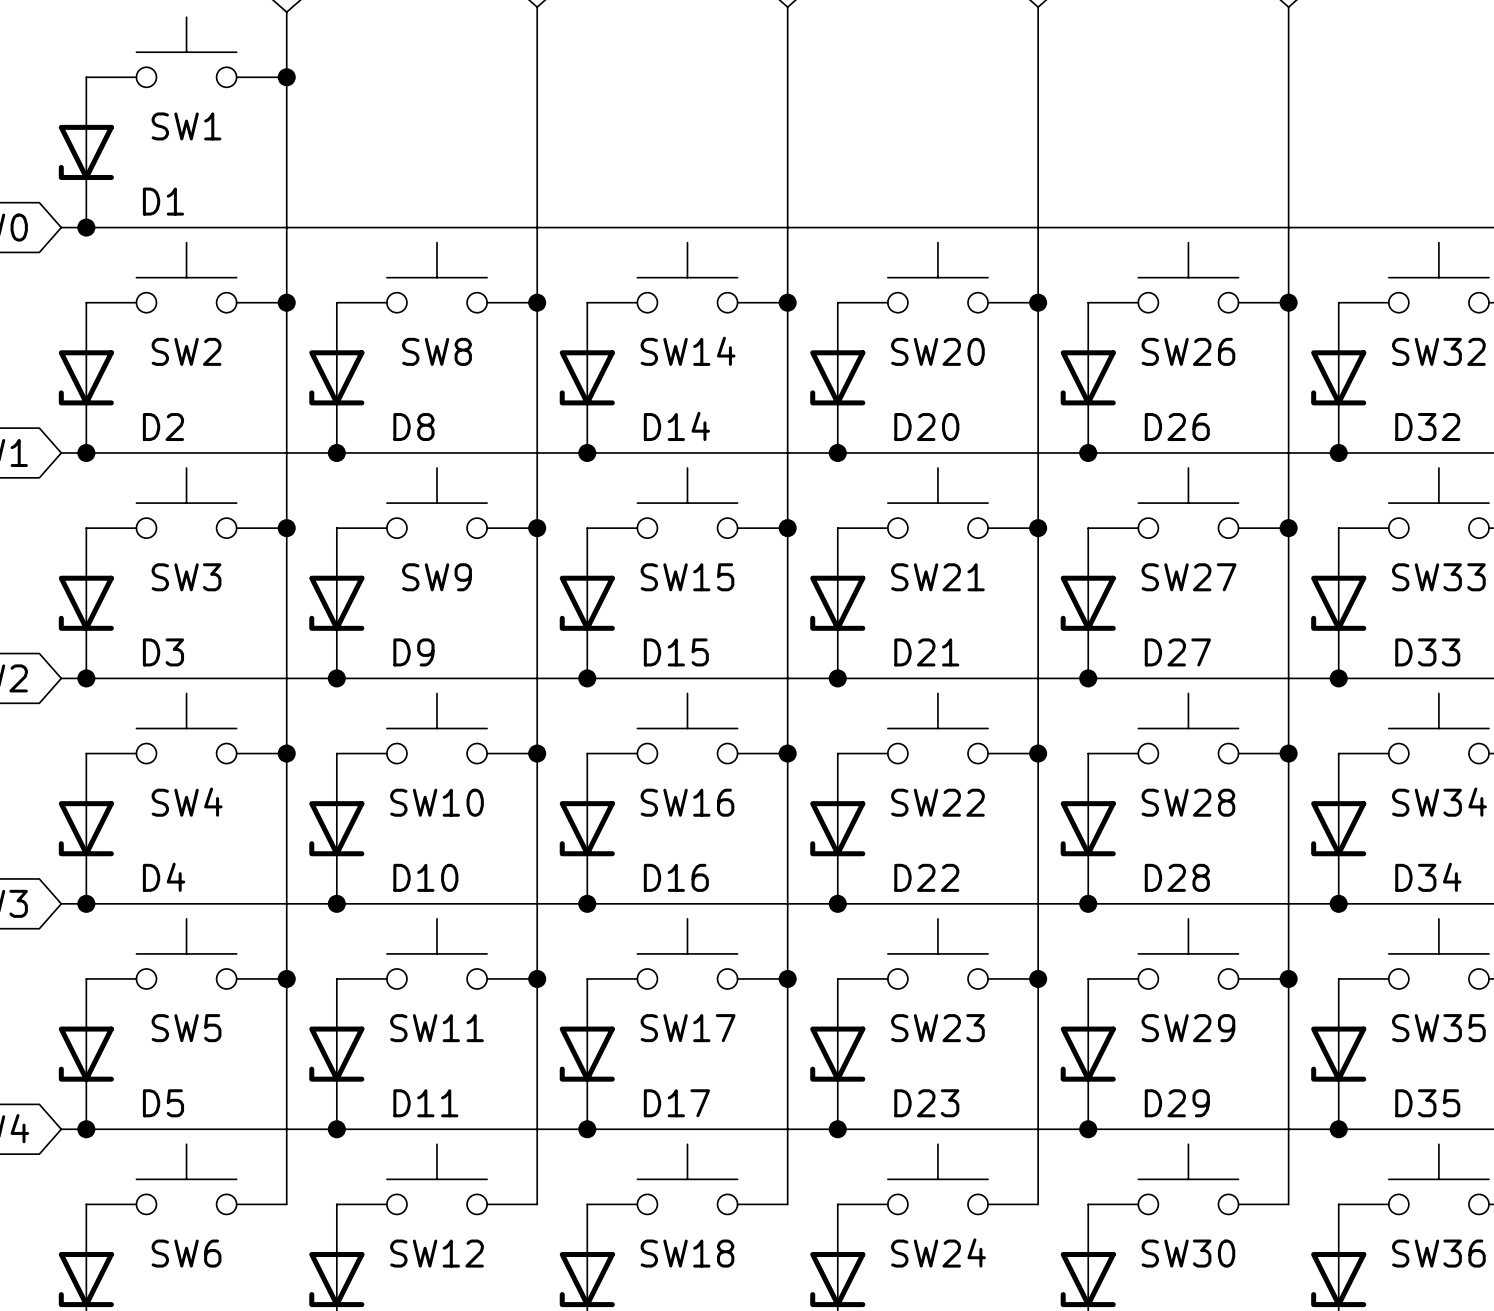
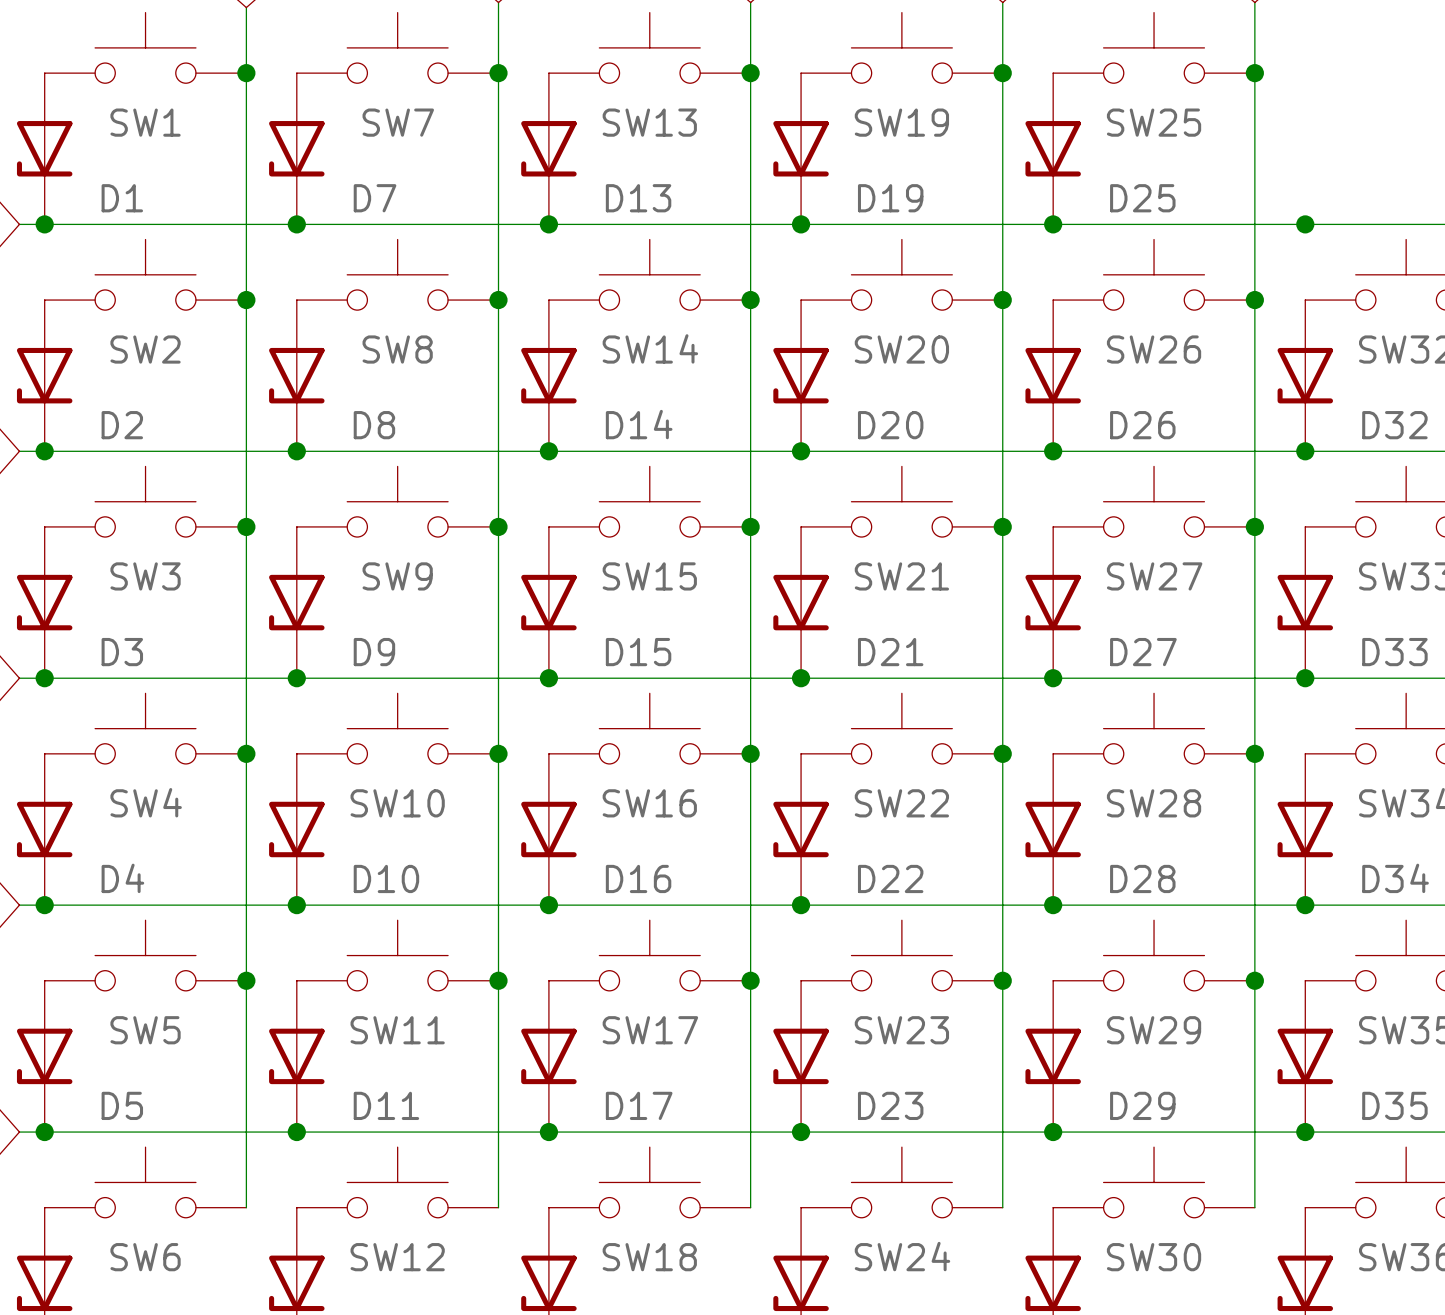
SW7: none -> (397, 47)
SW13: none -> (649, 47)
SW19: none -> (901, 47)
SW25: none -> (1154, 47)
junction: none -> (498, 73)
junction: none -> (750, 73)
junction: none -> (1002, 73)
junction: none -> (1254, 73)
D7: none -> (296, 148)
D13: none -> (548, 148)
D19: none -> (801, 148)
D25: none -> (1053, 148)
junction: none -> (296, 224)
junction: none -> (548, 224)
junction: none -> (801, 224)
junction: none -> (1053, 224)
junction: none -> (1305, 224)

